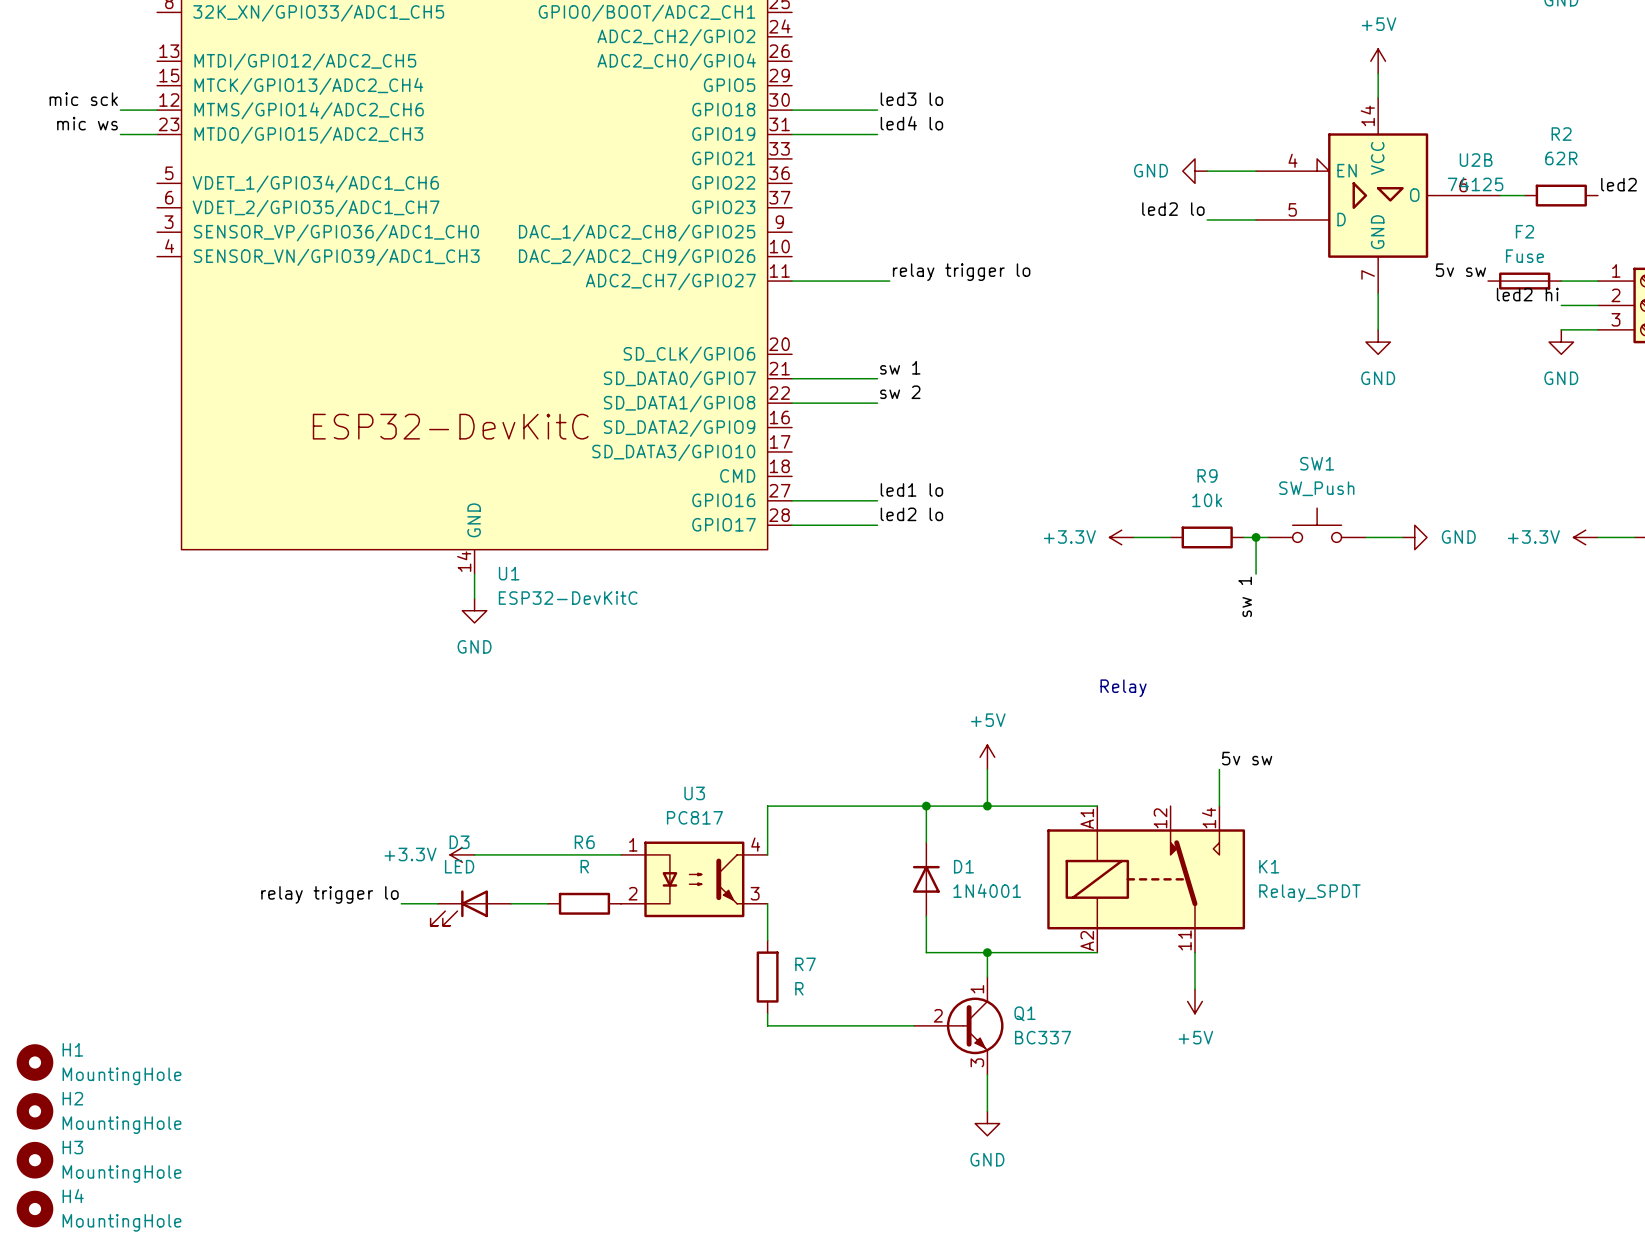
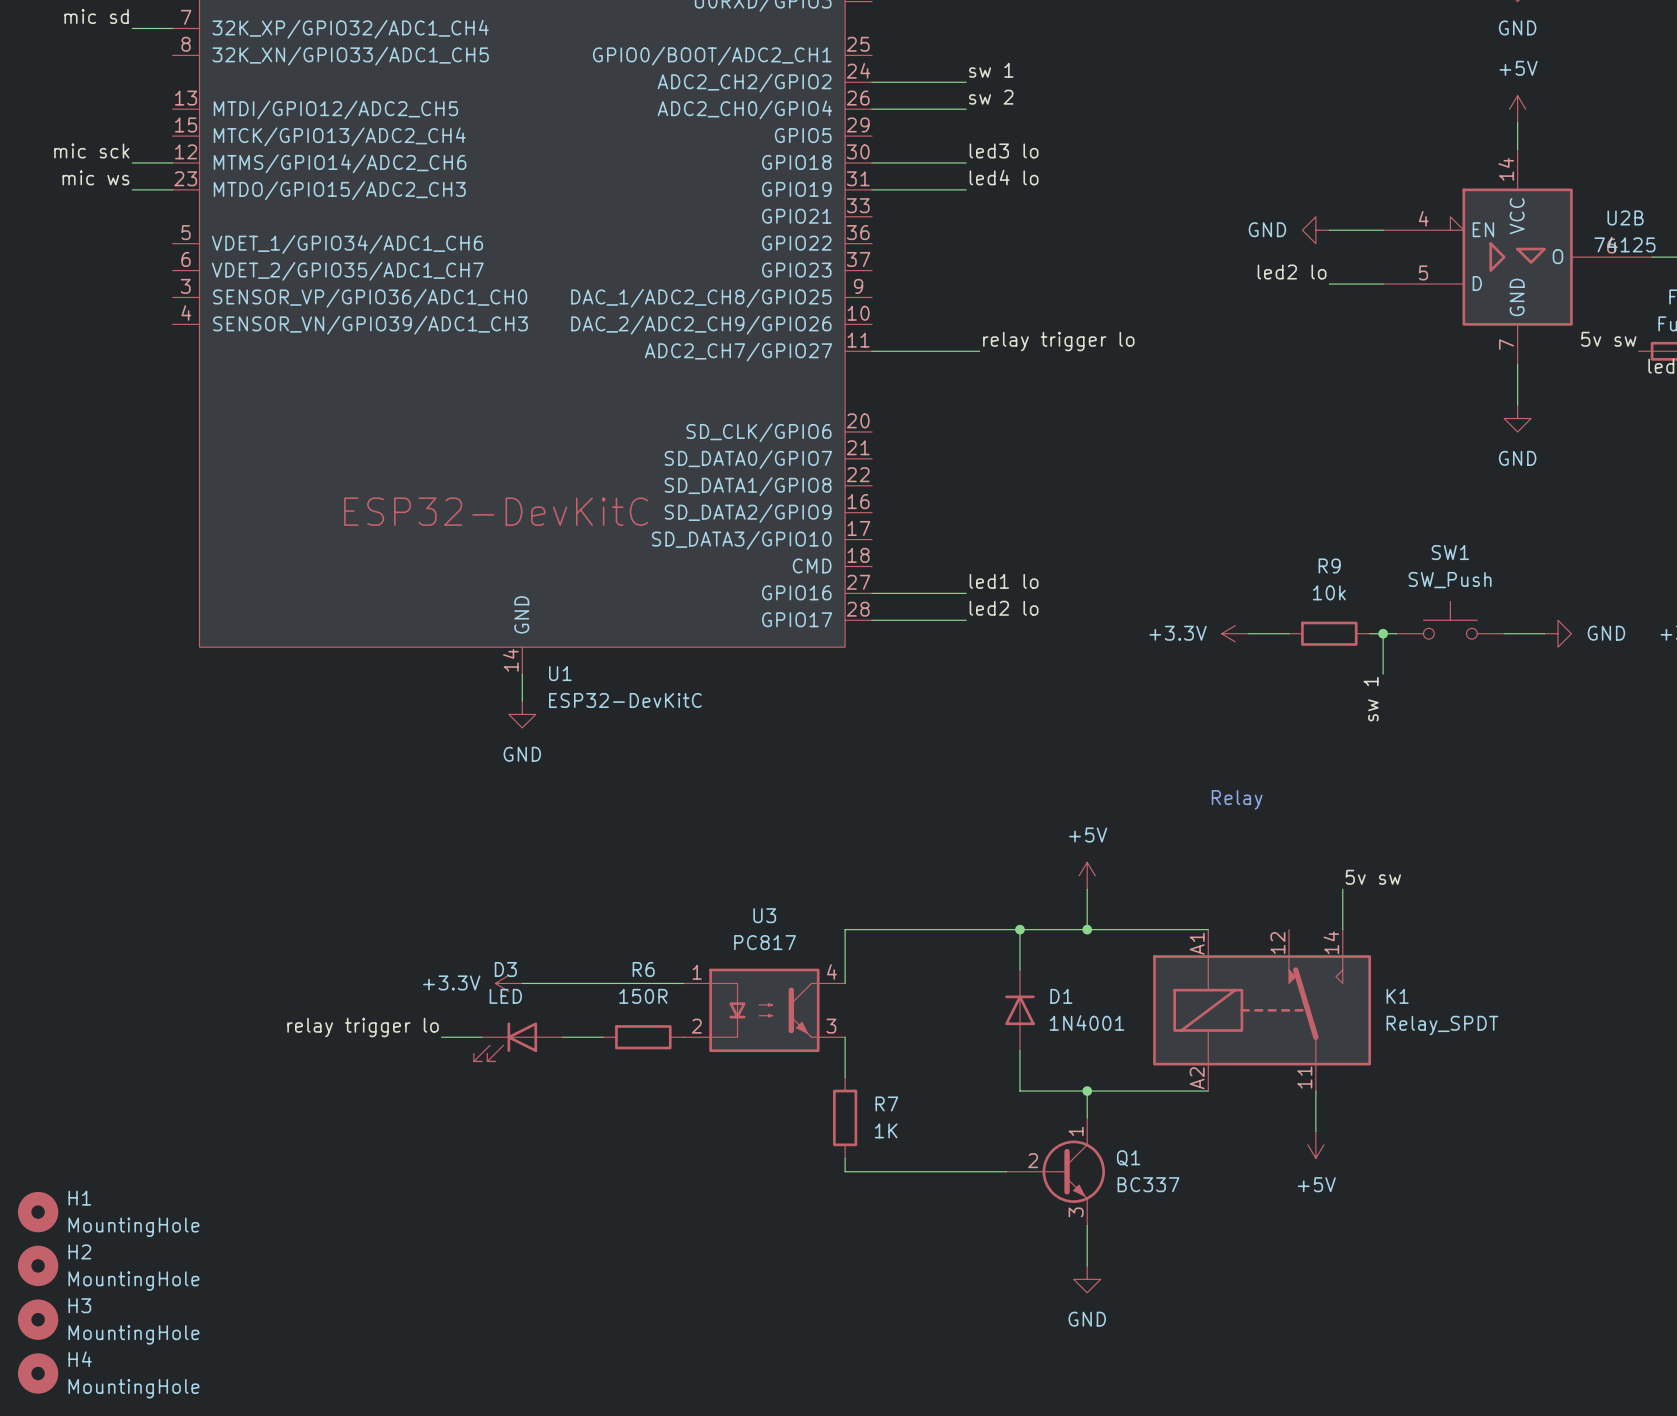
label: none -> sw 1 (991, 70)
wire: none -> (872, 82) (966, 82)
label: none -> sw 2 (991, 97)
wire: none -> (872, 109) (966, 109)
label: sw 1 (900, 367) -> none
wire: (792, 378) (877, 378) -> none
label: sw 2 (900, 392) -> none
wire: (792, 403) (877, 403) -> none
R6 value: R (584, 866) -> 150R (643, 996)
R7 value: R (799, 988) -> 1K (886, 1130)

